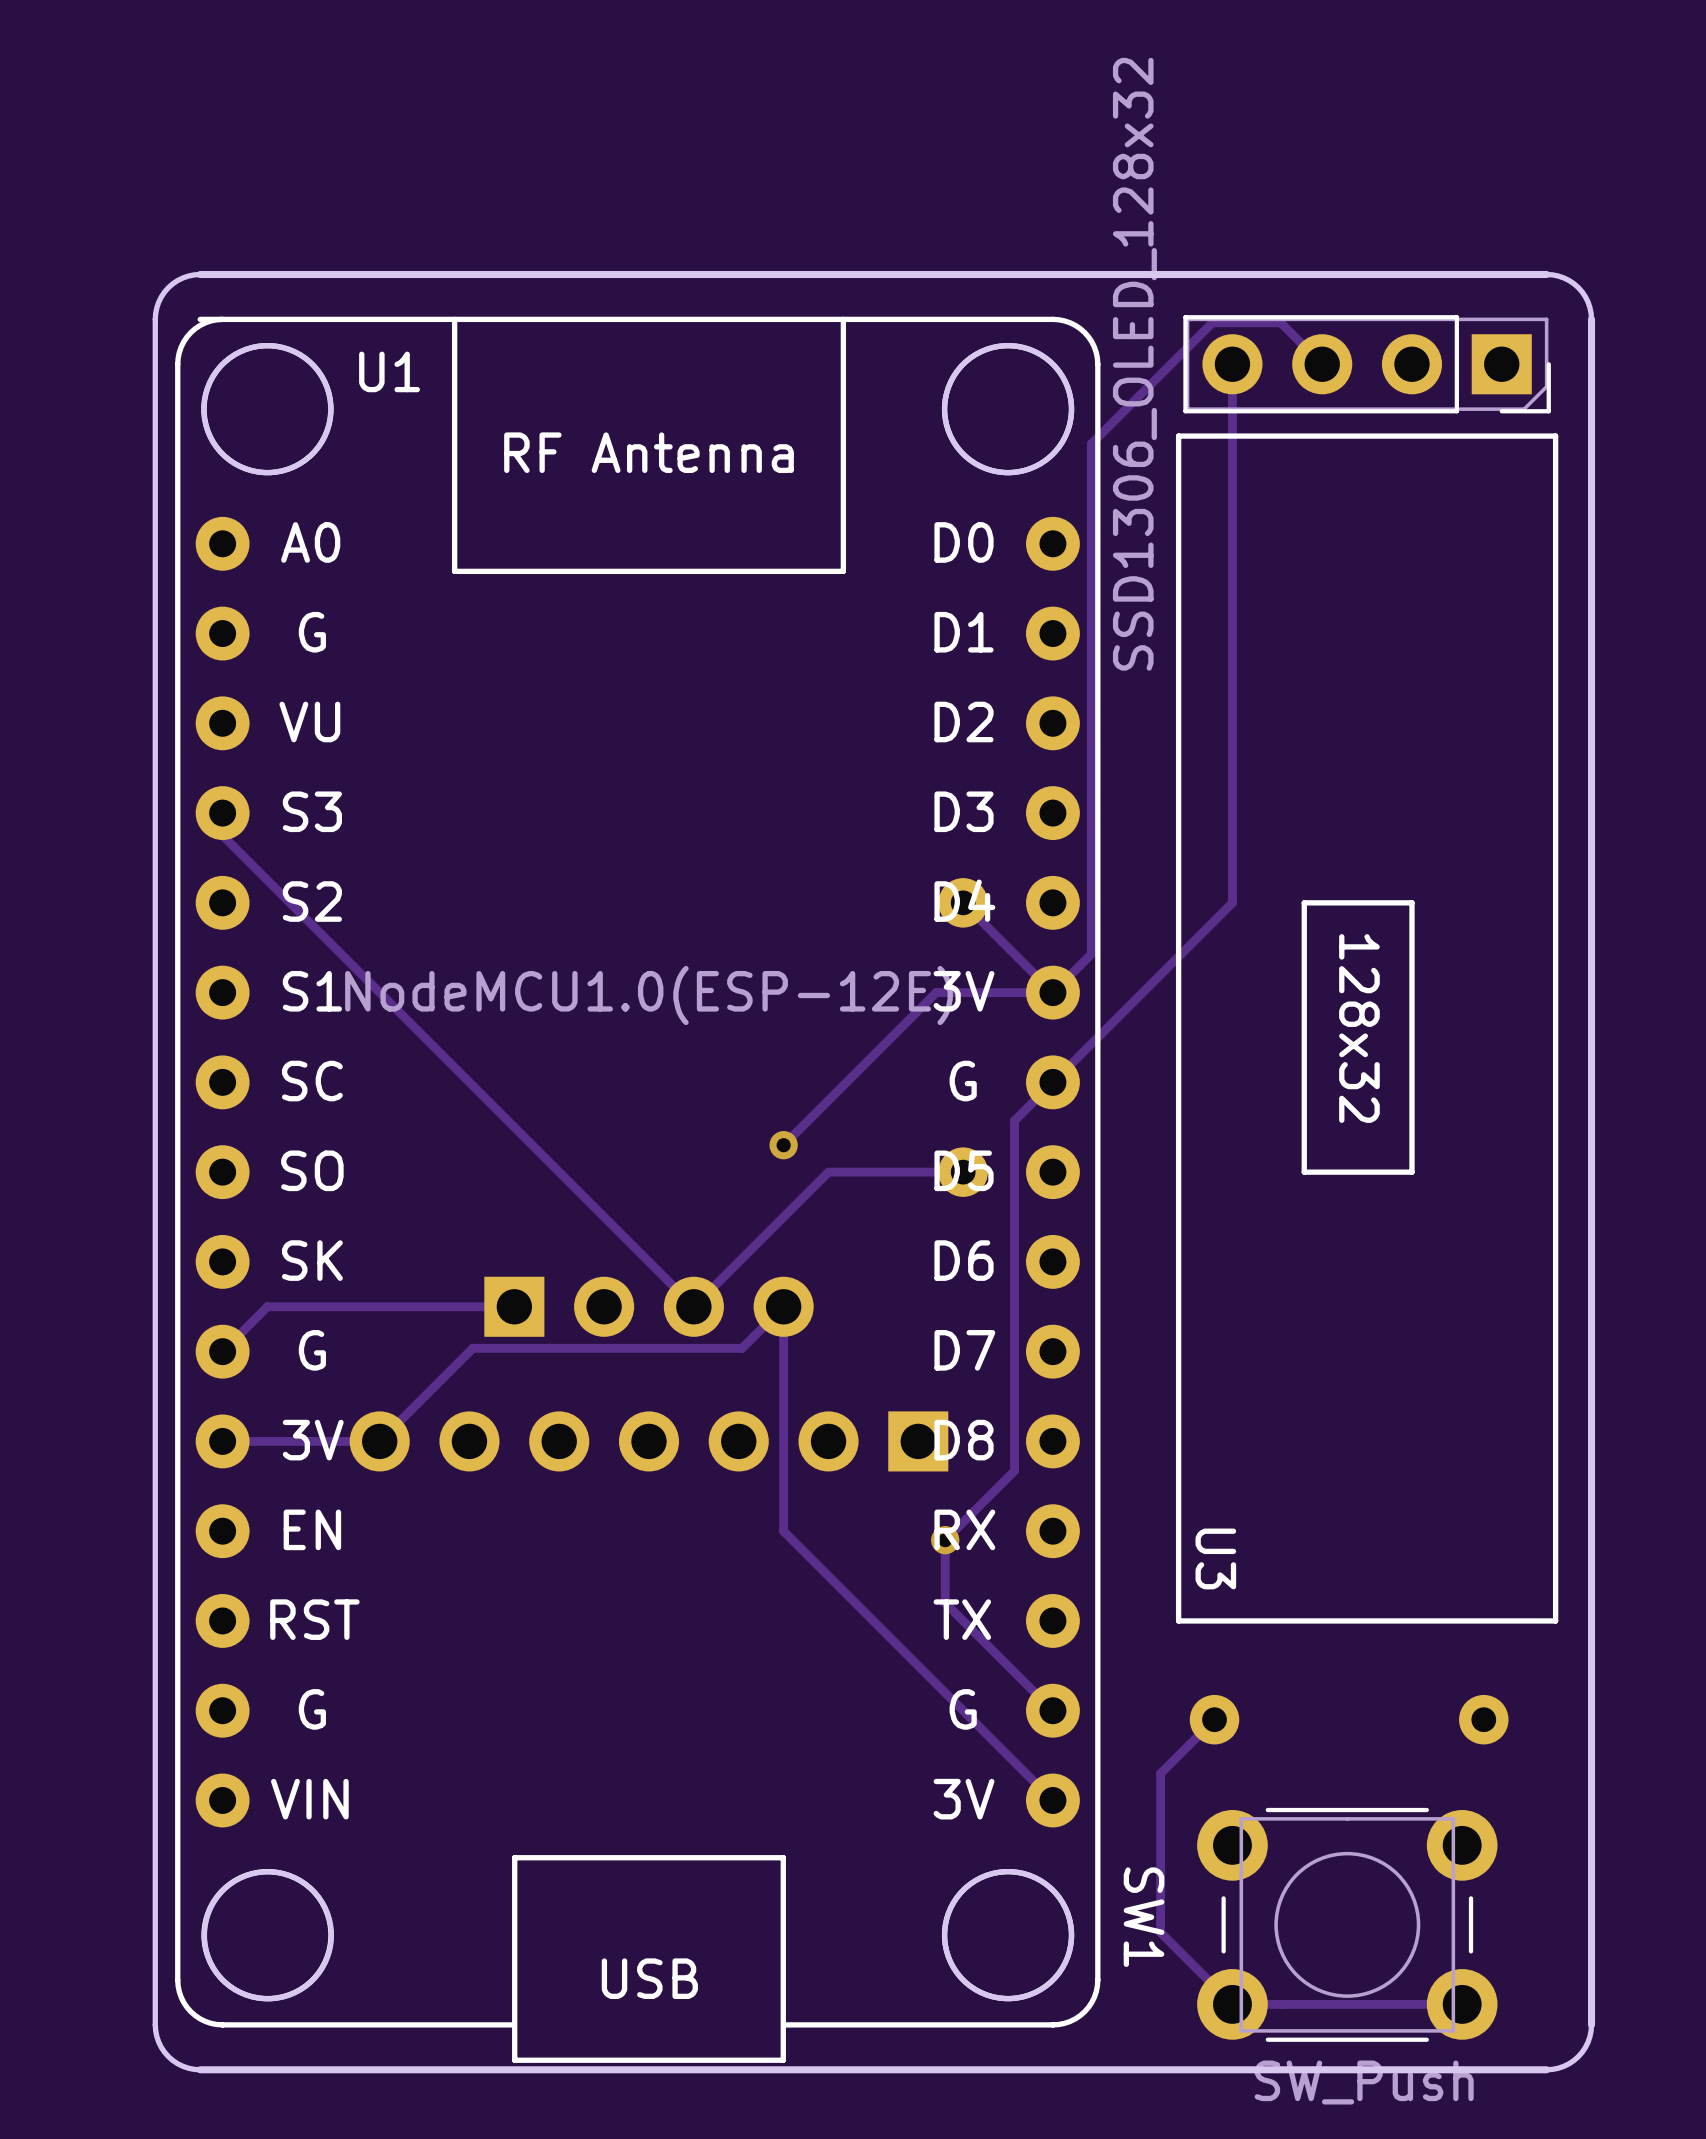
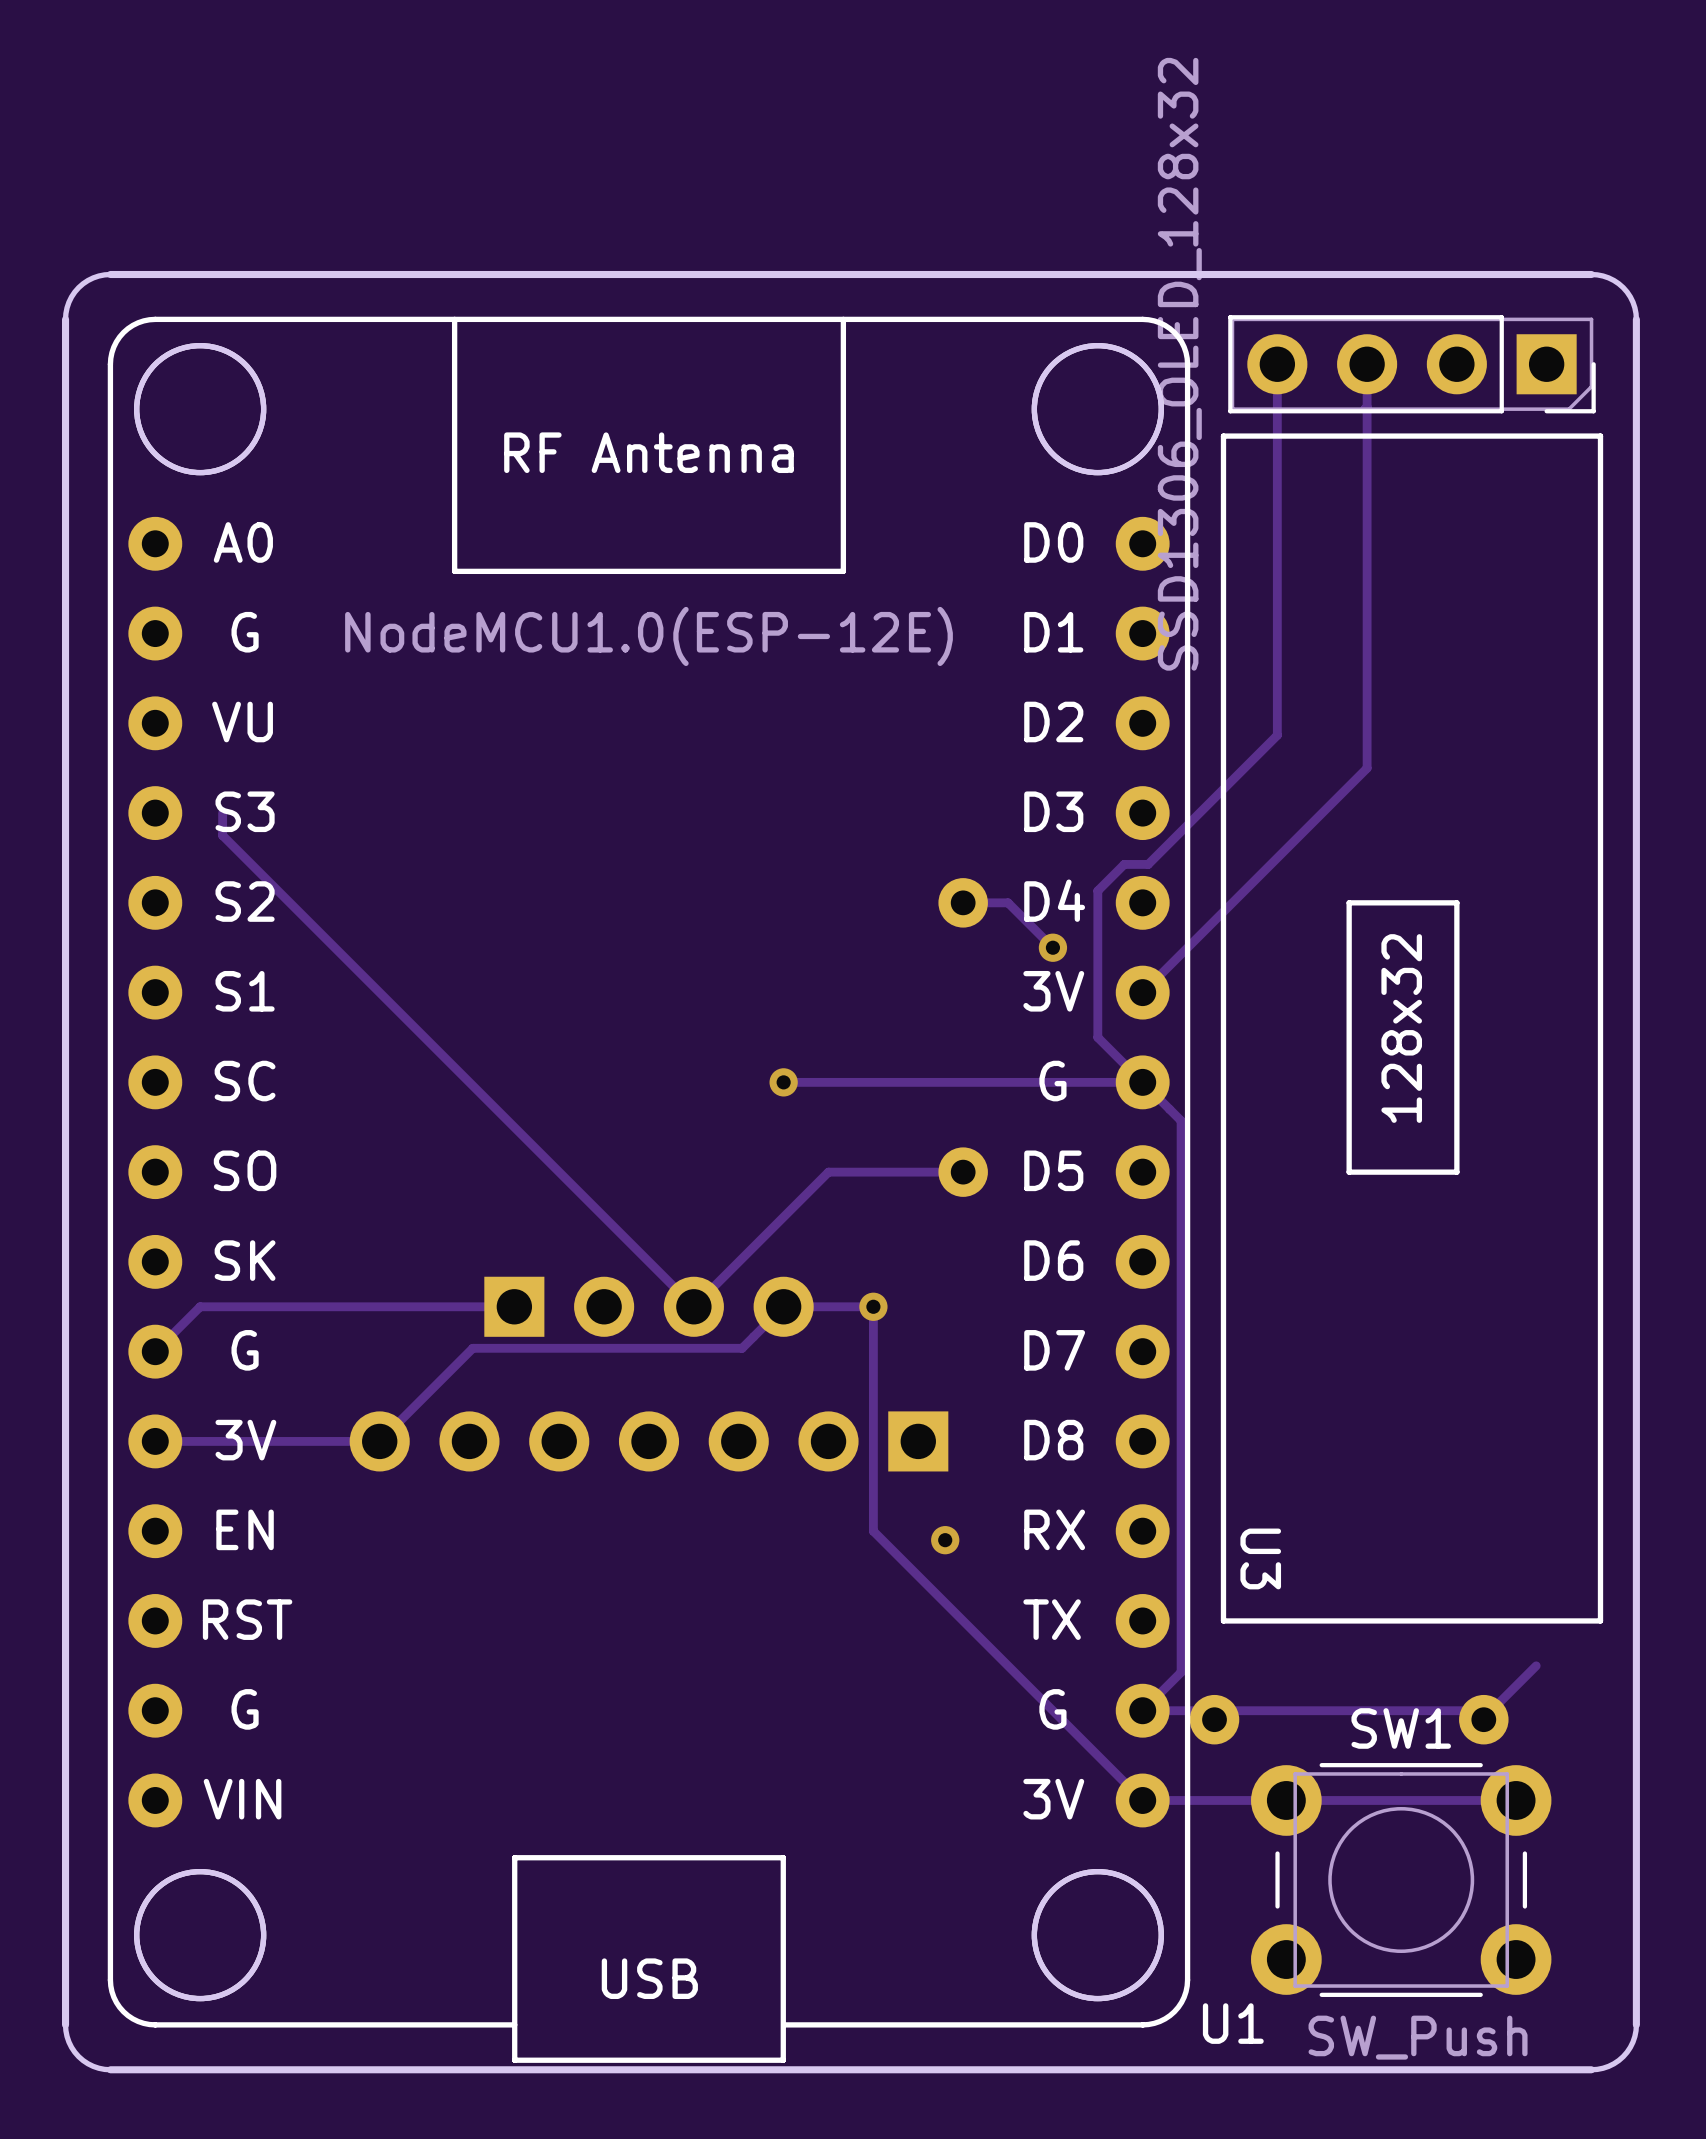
board edge: (200, 274) (183, 277) (168, 287) (158, 302) (155, 319) (155, 2024) (158, 2042) (168, 2056) (183, 2066) (200, 2069) -> (200, 274) (98, 276) (87, 280) (74, 292) (67, 307) (65, 319) (65, 2030) (68, 2042) (74, 2052) (87, 2063) (98, 2068) (200, 2069)
board edge: (1546, 274) (1563, 277) (1578, 287) (1588, 302) (1591, 319) (1591, 2024) (1588, 2042) (1578, 2056) (1563, 2066) (1546, 2069) -> (1546, 274) (1597, 274) (1613, 280) (1623, 287) (1630, 296) (1634, 307) (1636, 319) (1636, 2024) (1634, 2036) (1630, 2047) (1623, 2056) (1613, 2063) (1597, 2069) (1546, 2069)
U1 footprint: [175, 316, 1101, 2063] -> [107, 316, 1191, 2063]
track: (1232, 364) (1232, 902) -> (1367, 364) (1367, 406) (1364, 409) (1367, 409) (1367, 768) (1232, 902)
track: none -> (1277, 364) (1277, 735) (1148, 864) (1124, 864) (1097, 890) (1097, 1037) (1181, 1120) (1181, 1672) (1142, 1710) (1491, 1710) (1536, 1665)
track: (1322, 364) (1280, 322) (1212, 322) (1091, 443) (1091, 954) (1052, 992) -> none
U1 name position: U1 (389, 371) -> U1 (1233, 2023)
round board edge position: (267, 409) -> (200, 409)
round board edge position: (1008, 409) -> (1097, 409)
track: (963, 902) (1052, 992) -> (963, 902) (1008, 902) (1052, 947)
via: none -> (1052, 947)
U3 position: (1367, 969) -> (1411, 969)
track: (1052, 992) (936, 992) (783, 1145) -> none
track: (1142, 992) (1014, 1120) (1014, 1470) (945, 1540) (945, 1603) -> none
U1 value position: NodeMCU1.0(ESP-12E) (649, 995) -> NodeMCU1.0(ESP-12E) (649, 636)
track: none -> (783, 1082) (1142, 1082)
via position: (783, 1145) -> (783, 1082)
track: (267, 1306) (222, 1351) -> (267, 1306) (200, 1306) (155, 1351)
track: (783, 1306) (783, 1531) (1052, 1800) -> (783, 1306) (873, 1306) (873, 1531) (945, 1603)
via: none -> (873, 1306)
track: none -> (155, 1441) (222, 1441)
track: none -> (1052, 1710) (1142, 1800) (1516, 1800)
track: (1214, 1719) (1160, 1773) (1160, 1932) (1232, 2004) (1462, 2004) -> none
SW1 name rotation: 0° (1144, 1917) -> 90° counterclockwise (1401, 1728)
SW1 name position: SW1 (1144, 1917) -> SW1 (1401, 1728)
SW1 position: (1347, 1924) -> (1401, 1880)
round board edge position: (267, 1935) -> (200, 1935)
round board edge position: (1008, 1935) -> (1097, 1935)

